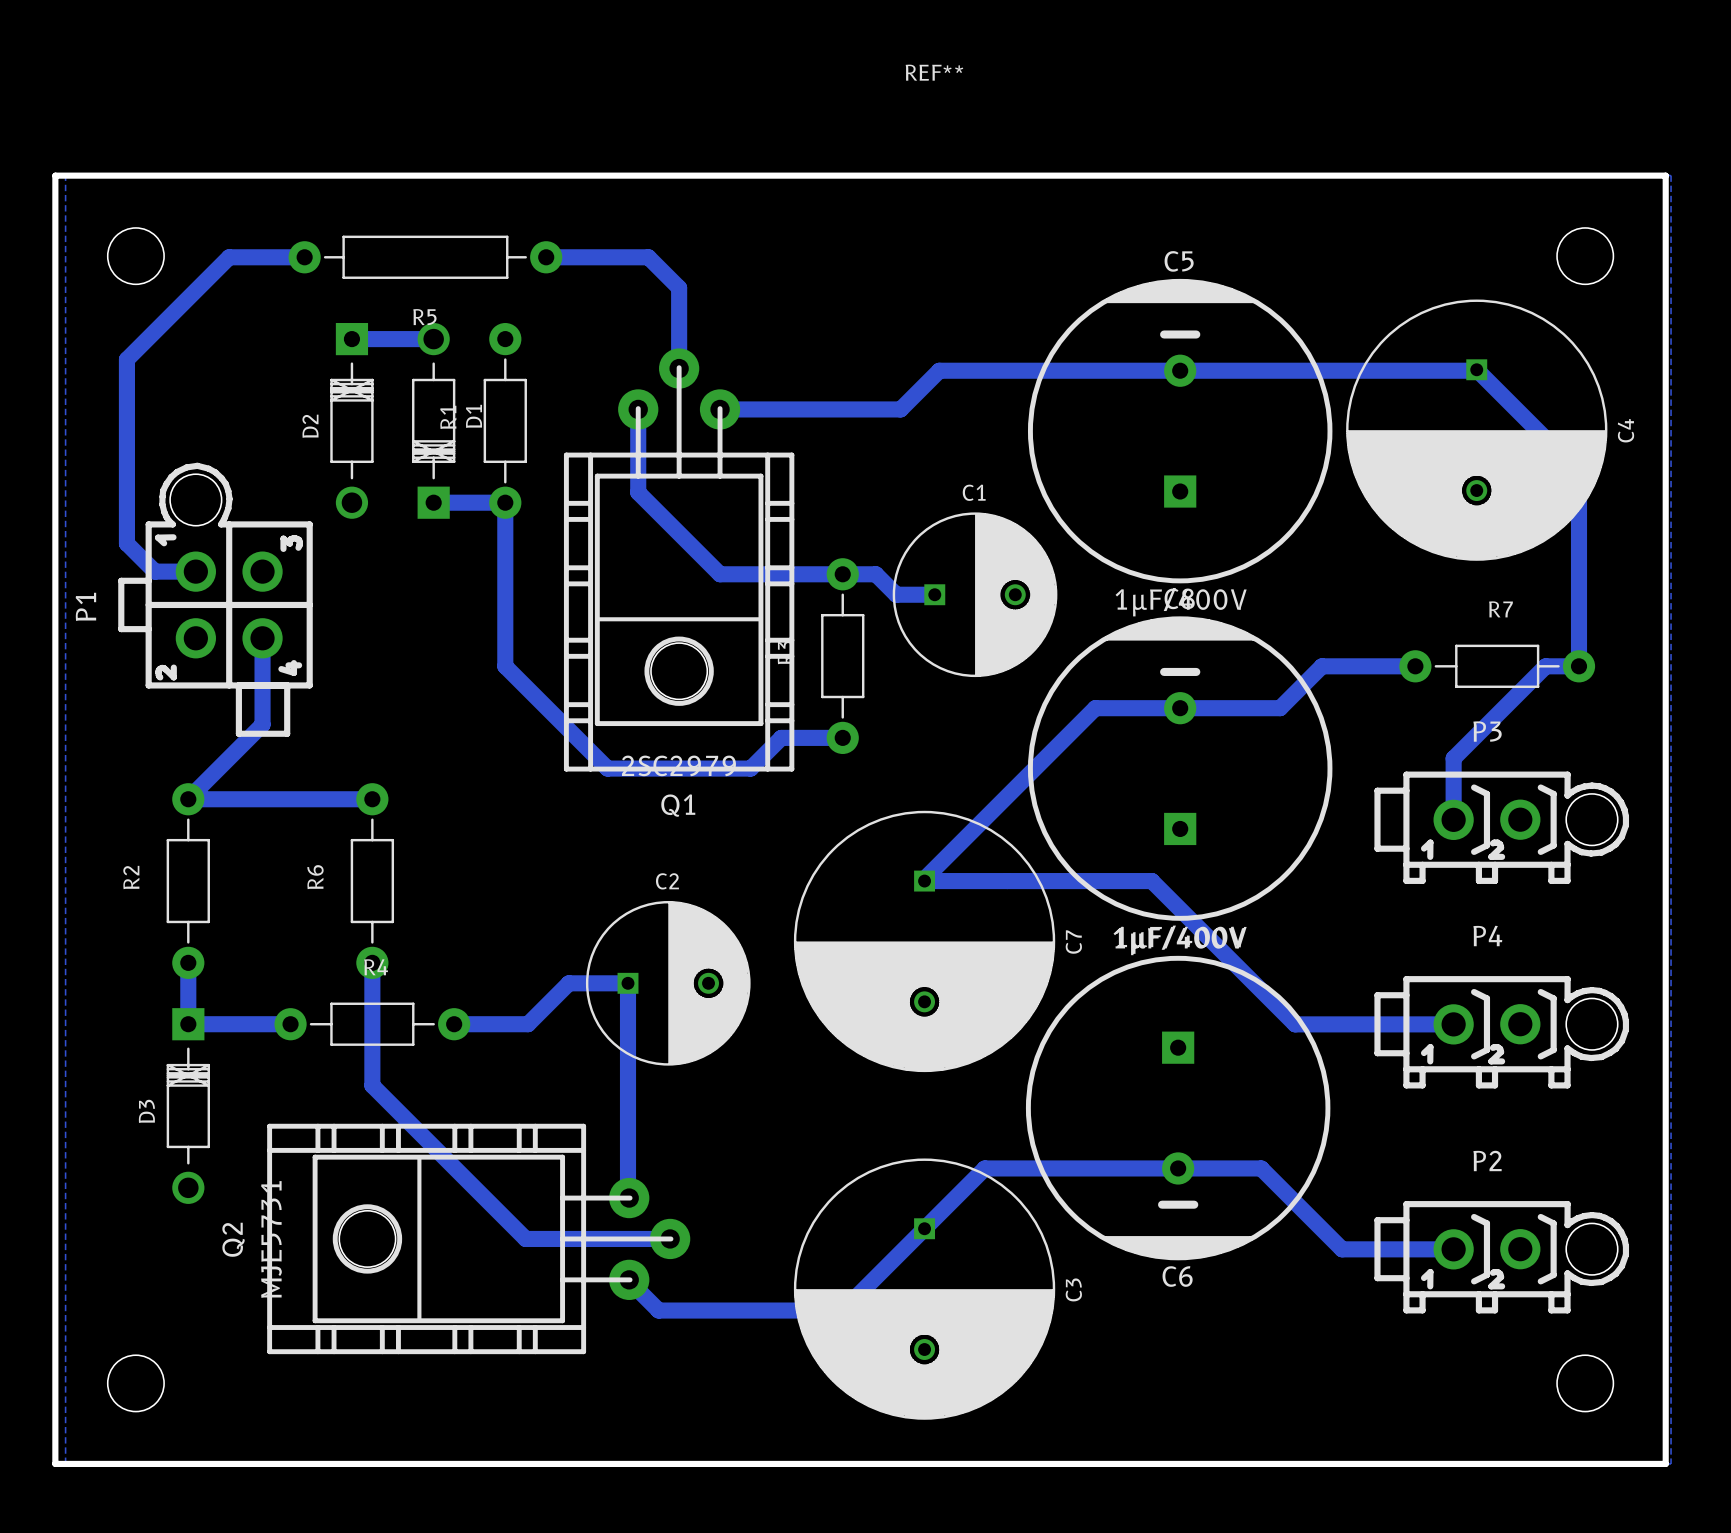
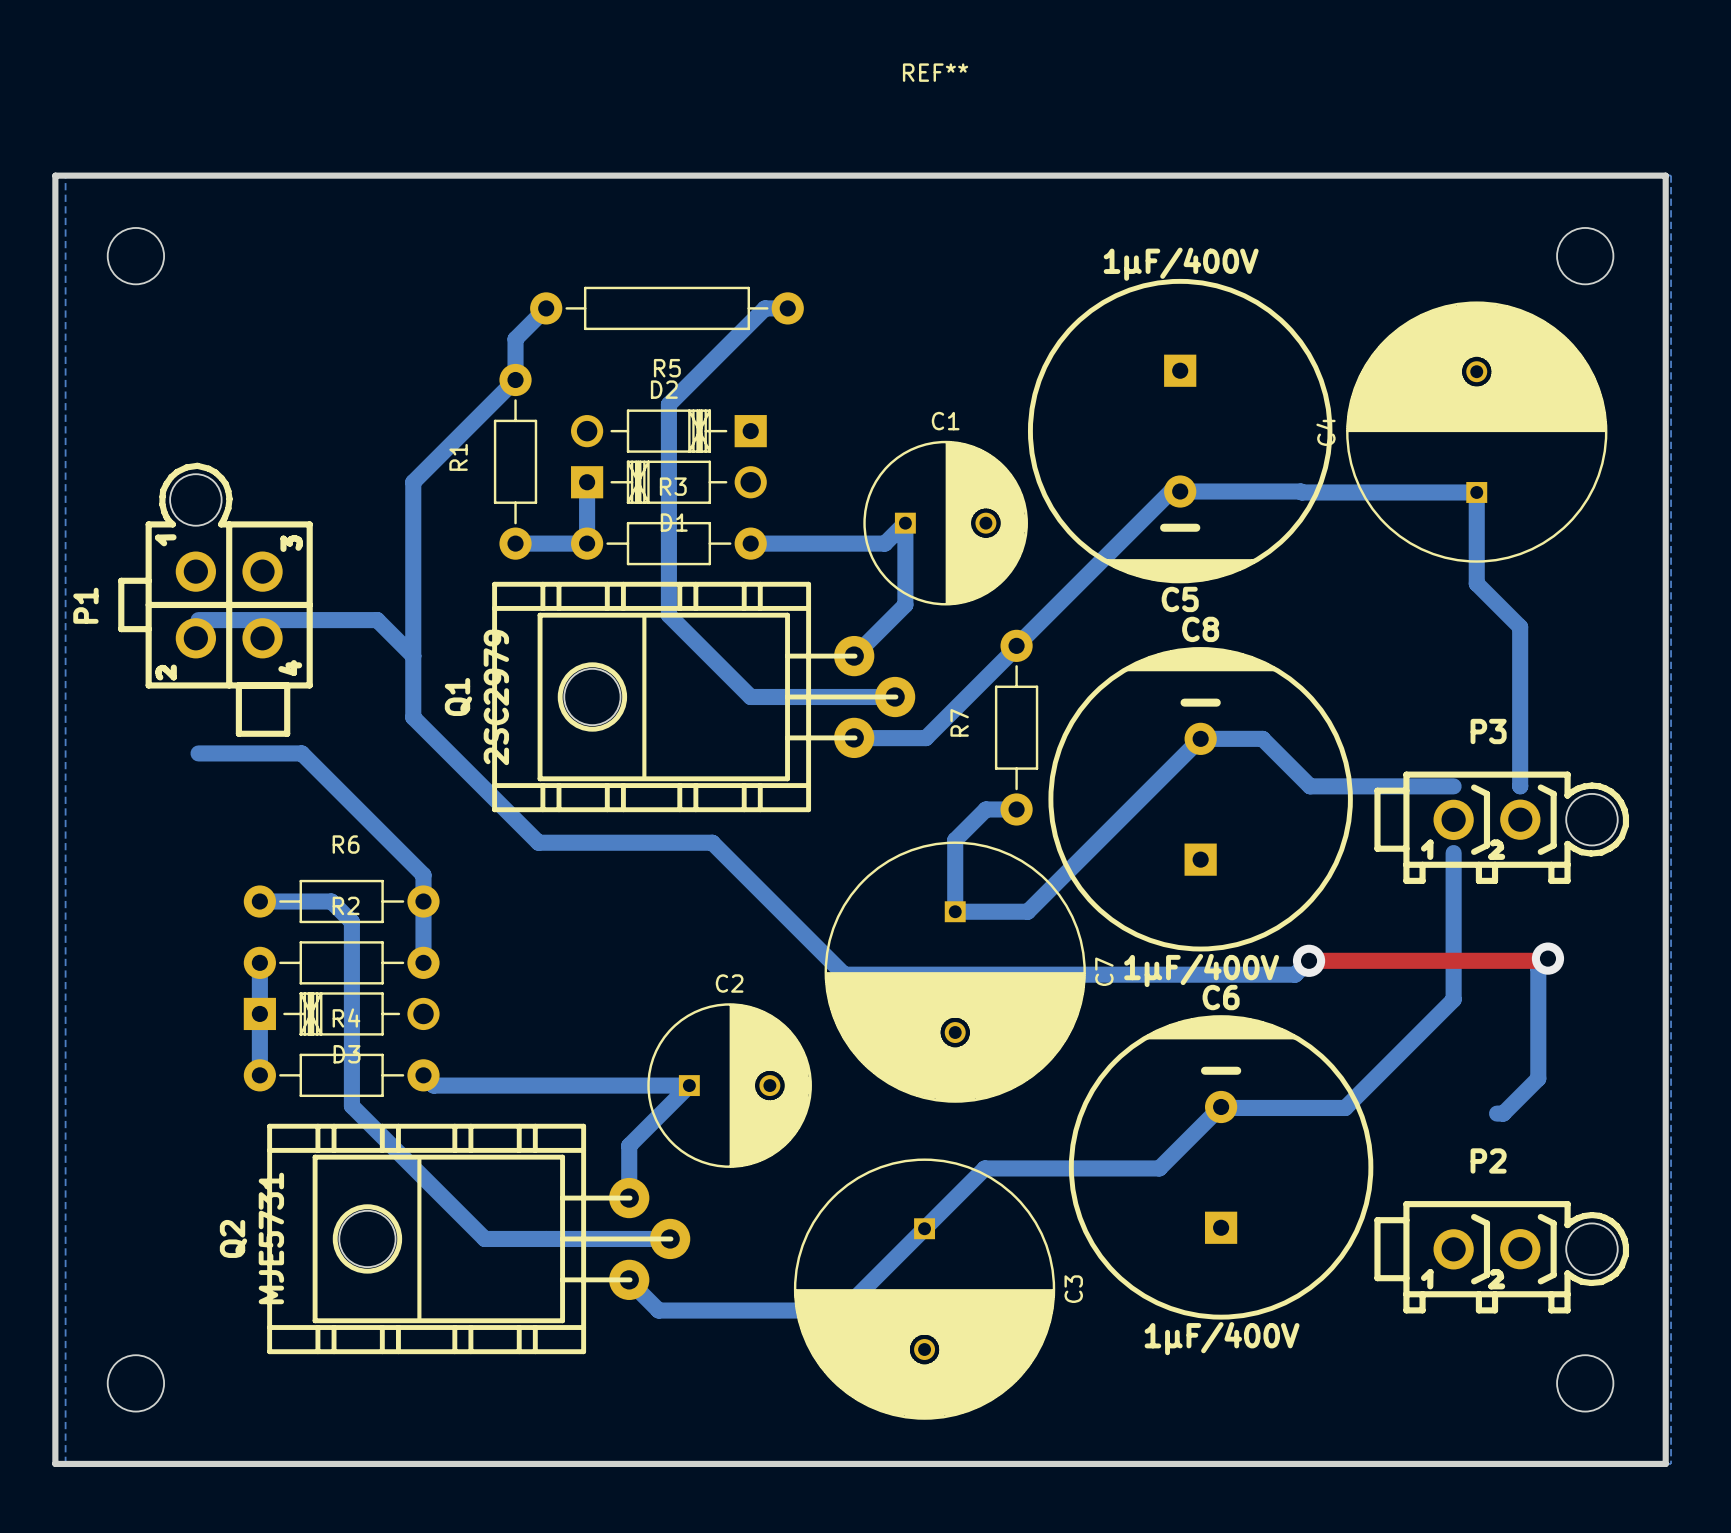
bottom track: (304, 257) (229, 257) (126, 359) (126, 543) (154, 571) (195, 571) -> none
R5 position: (425, 257) -> (666, 308)
bottom track: (546, 257) (648, 257) (679, 287) (679, 368) -> none
bottom track: none -> (546, 308) (515, 339) (515, 379) (413, 482) (413, 717) (538, 842) (712, 842) (844, 974) (1295, 974) (1309, 960)
bottom track: none -> (787, 308) (764, 308) (668, 404) (668, 615) (750, 696) (895, 696)
bottom track: (351, 339) (433, 339) -> none
bottom track: (638, 409) (638, 492) (720, 574) (875, 574) (896, 594) (934, 594) -> none
bottom track: (720, 409) (900, 409) (939, 370) (1476, 369) (1579, 472) (1579, 666) (1545, 666) (1453, 758) (1453, 819) -> none
D2 rotation: 0° (351, 420) -> 90° clockwise (668, 431)
D2 position: (351, 420) -> (668, 431)
D1 rotation: 0° (433, 420) -> 90° clockwise (668, 482)
D1 position: (433, 420) -> (668, 482)
R1 position: (505, 420) -> (515, 461)
C4 rotation: 0° (1476, 430) -> 180° (1476, 432)
C5 rotation: 0° (1180, 431) -> 180° (1180, 431)
bottom track: none -> (587, 482) (587, 543) (515, 543)
bottom track: (433, 502) (505, 502) (505, 666) (607, 768) (750, 768) (781, 737) (842, 737) -> none
bottom track: none -> (750, 543) (884, 543) (905, 523) (905, 604) (852, 656)
Q1 rotation: 0° (679, 559) -> 90° clockwise (703, 696)
C1 position: (975, 594) -> (945, 523)
R7 name position: R7 (1500, 609) -> R7 (959, 722)
bottom track: none -> (198, 620) (377, 620) (413, 656)
bottom track: (262, 638) (262, 724) (188, 798) -> none
R3 rotation: 0° (842, 656) -> 90° clockwise (668, 543)
R3 position: (842, 656) -> (668, 543)
bottom track: (1415, 666) (1321, 666) (1280, 708) (1095, 708) (924, 881) (1151, 881) (1295, 1024) (1453, 1024) -> none
R7 rotation: 0° (1497, 666) -> 90° clockwise (1016, 727)
R7 position: (1497, 666) -> (1016, 727)
bottom track: none -> (854, 738) (925, 738) (1170, 491) (1476, 492) (1476, 583) (1520, 627) (1520, 786)
bottom track: none -> (198, 753) (301, 753) (423, 875) (423, 962)
C8 position: (1180, 768) -> (1200, 799)
bottom track: none -> (1453, 786) (1310, 786) (1262, 738) (1200, 738) (1027, 911) (955, 911) (955, 840) (985, 809) (1016, 809)
bottom track: (188, 799) (372, 799) -> none
bottom track: none -> (1453, 853) (1453, 999) (1345, 1107) (1221, 1106)
R2 rotation: 0° (188, 881) -> 90° clockwise (341, 962)
R2 position: (188, 881) -> (341, 962)
R6 rotation: 0° (372, 881) -> 90° clockwise (341, 901)
C7 position: (924, 941) -> (955, 972)
bottom track: none -> (1547, 958) (1538, 968) (1538, 1078) (1503, 1113) (1497, 1113)
top track: none -> (1547, 958) (1545, 960) (1309, 960)
via: none -> (1547, 958)
via: none -> (1309, 960)
bottom track: (188, 962) (188, 1024) -> none
bottom track: none -> (259, 962) (259, 1075)
bottom track: (372, 962) (372, 1085) (525, 1238) -> (259, 901) (331, 901) (351, 921) (351, 1106) (484, 1238) (525, 1238)
C2 position: (668, 983) -> (729, 1085)
bottom track: (188, 1024) (290, 1024) -> none
R4 position: (372, 1024) -> (341, 1075)
bottom track: (454, 1024) (528, 1024) (568, 983) (628, 983) (628, 1196) -> none
P4: (1501, 1032) -> none
bottom track: none -> (423, 1075) (433, 1085) (689, 1085) (629, 1145) (629, 1198)
D3 rotation: 0° (188, 1106) -> 90° counterclockwise (341, 1013)
D3 position: (188, 1106) -> (341, 1013)
C6 rotation: 0° (1178, 1108) -> 180° (1221, 1167)
bottom track: (1159, 1168) (1261, 1168) (1342, 1249) (1453, 1249) -> (1159, 1168) (1220, 1106)

